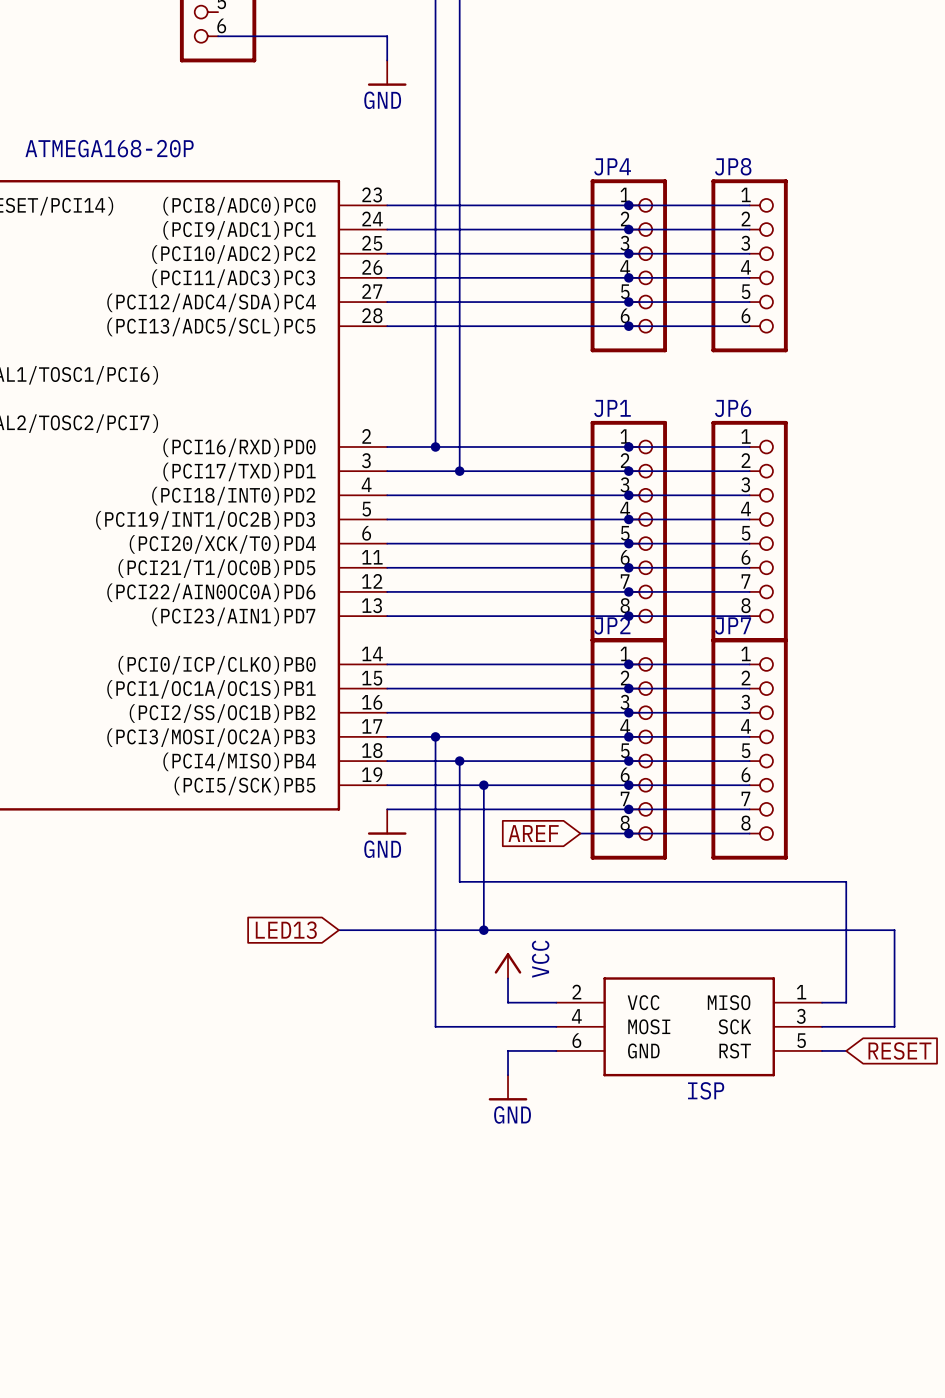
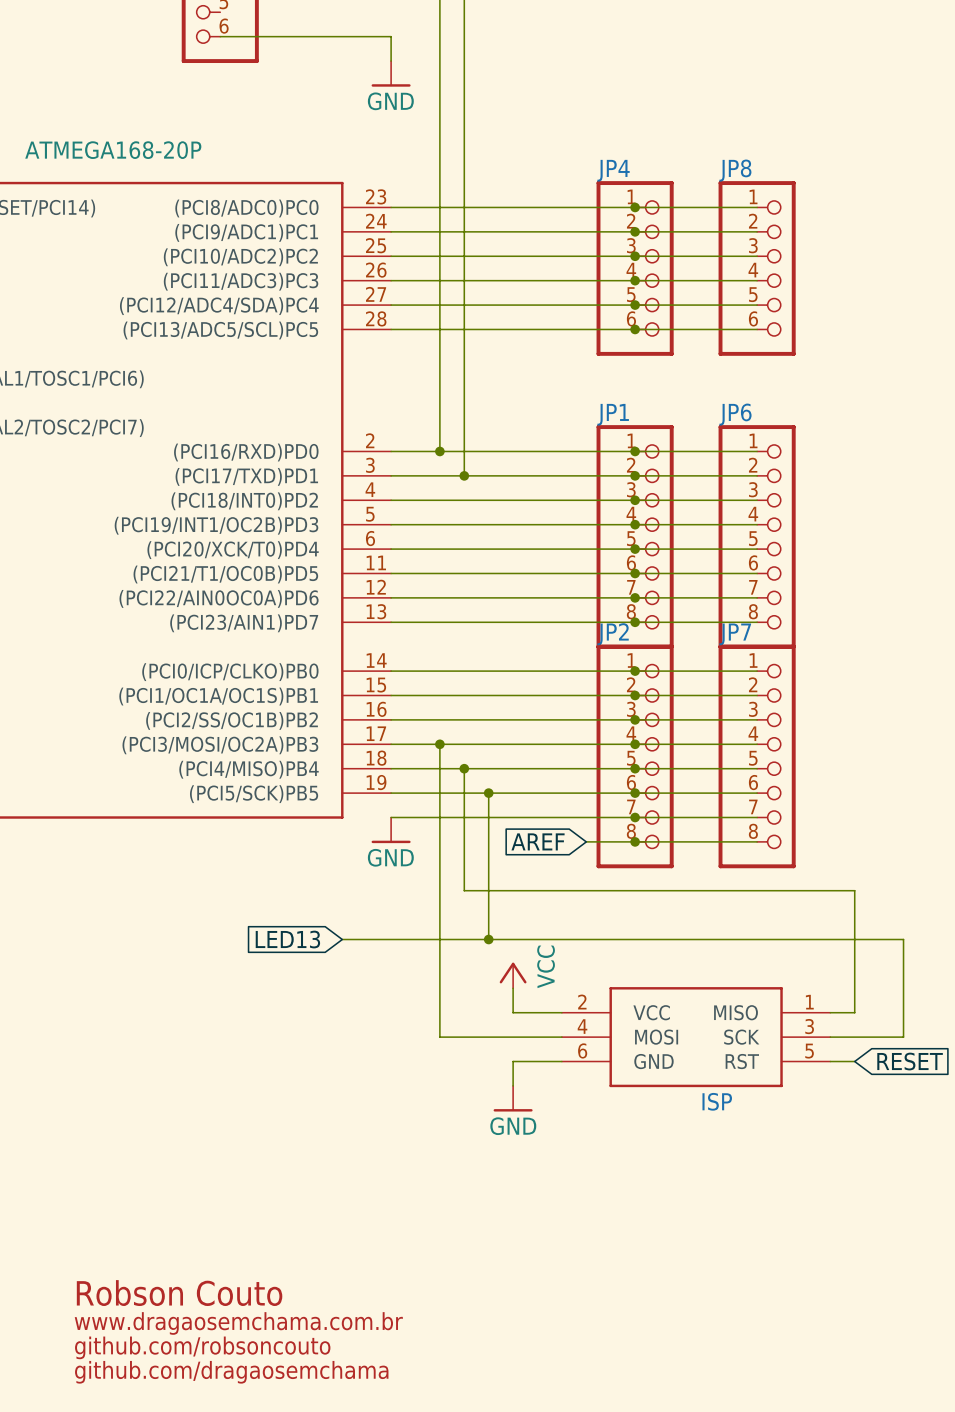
text: none -> Robson Couto (179, 1293)
text: none -> www.dragaosemchama.com.br (238, 1323)
text: none -> github.com/robsoncouto (202, 1347)
text: none -> github.com/dragaosemchama (231, 1372)

